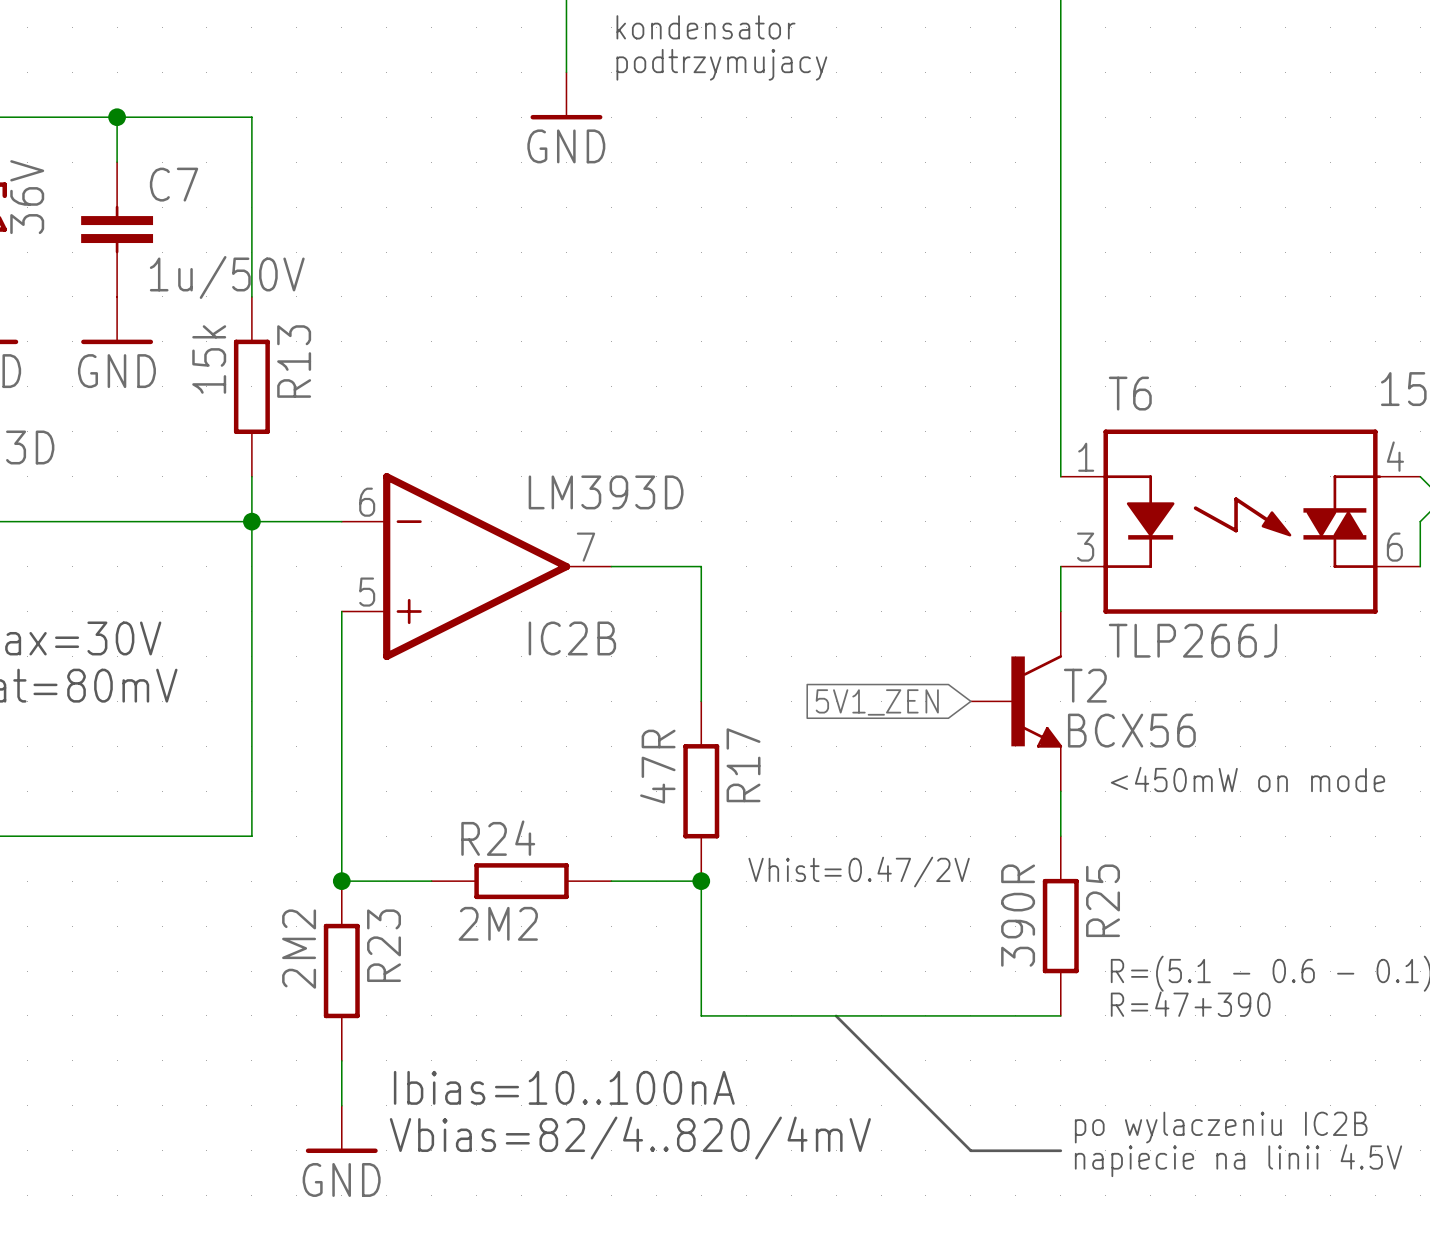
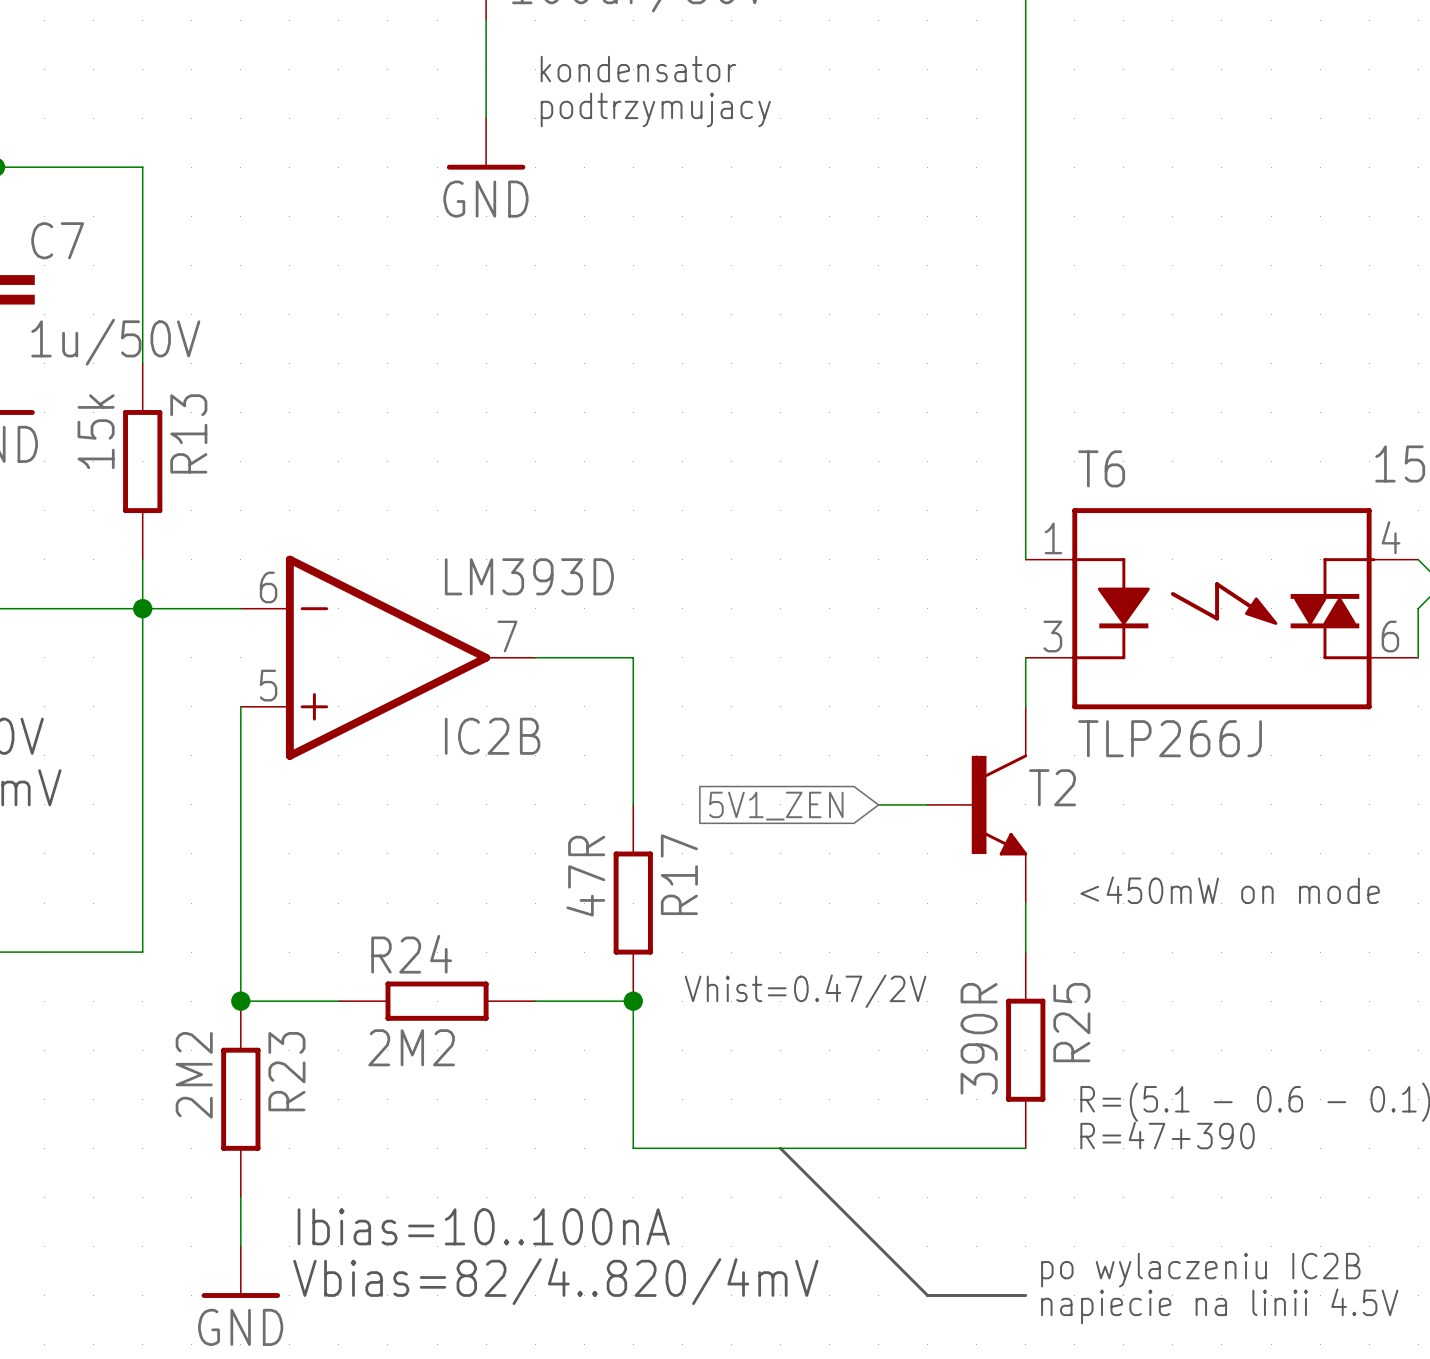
wire: none -> (878, 804) (927, 804)
global label position: 5V1_ZEN (877, 702) -> 5V1_ZEN (776, 806)
T2 value: BCX56 (1131, 730) -> none

